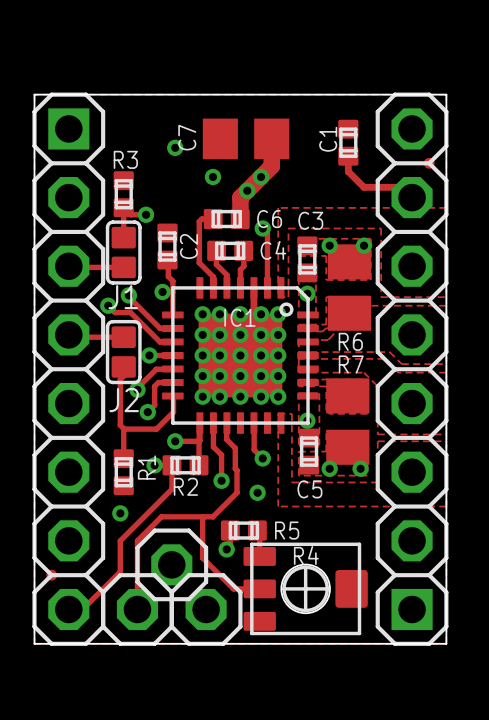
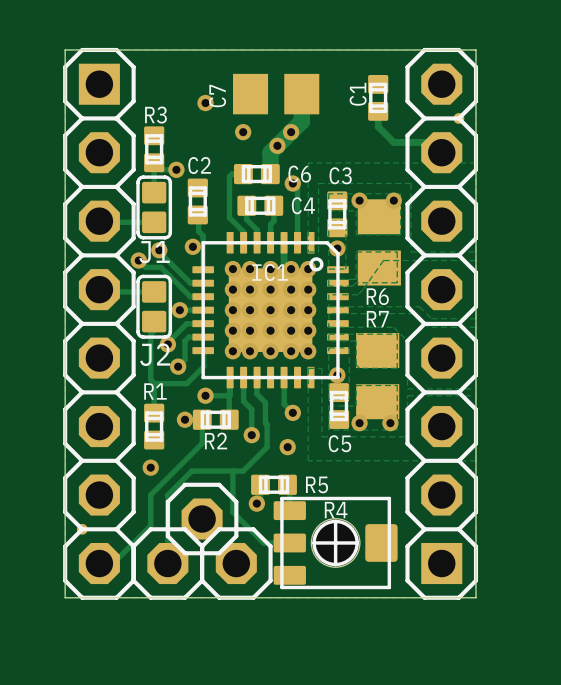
C2 name rotation: 0° (188, 246) -> 90° clockwise (199, 165)
C2 name position: C2 (188, 246) -> C2 (199, 165)
R1 name rotation: 0° (146, 467) -> 90° clockwise (155, 391)
R1 name position: R1 (146, 467) -> R1 (155, 391)

